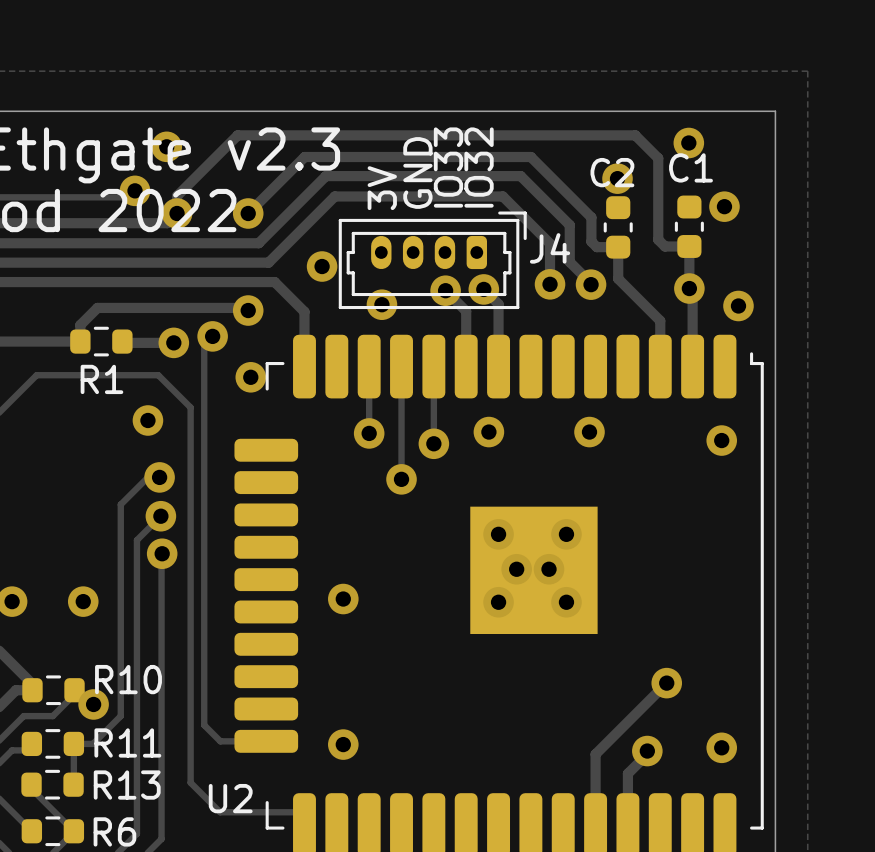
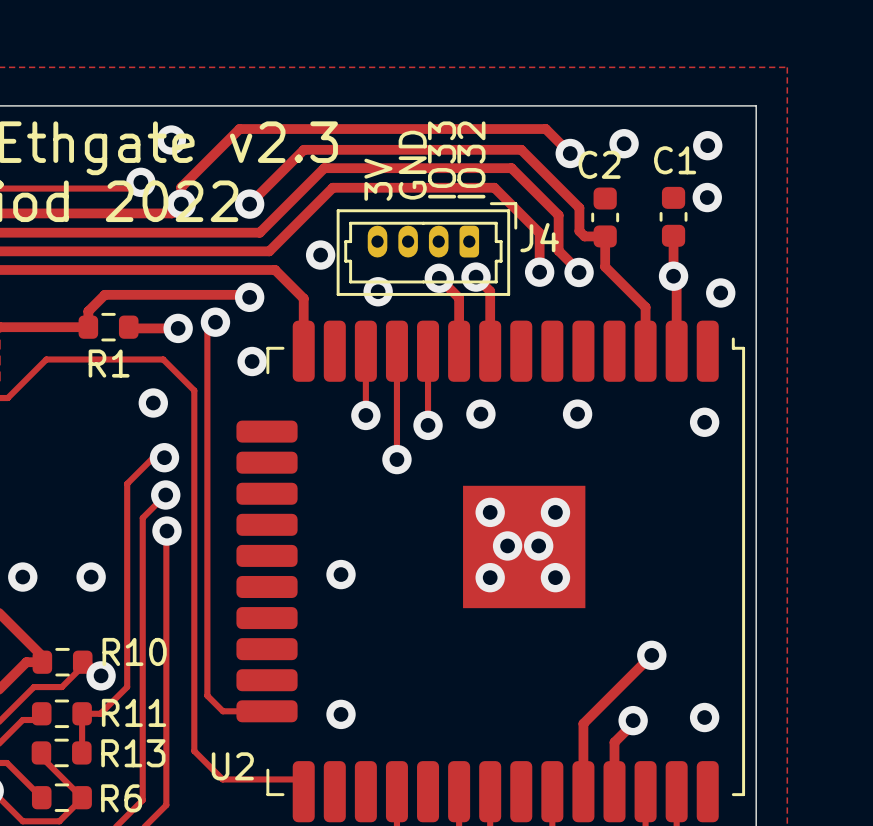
track: (556, 135) (635, 135) (658, 158) (658, 239) (664, 246) (689, 246) -> (545, 129) (570, 153)
via: (688, 143) -> none
via: none -> (624, 143)
via: none -> (707, 145)
via: none -> (570, 153)
via: (617, 178) -> none

